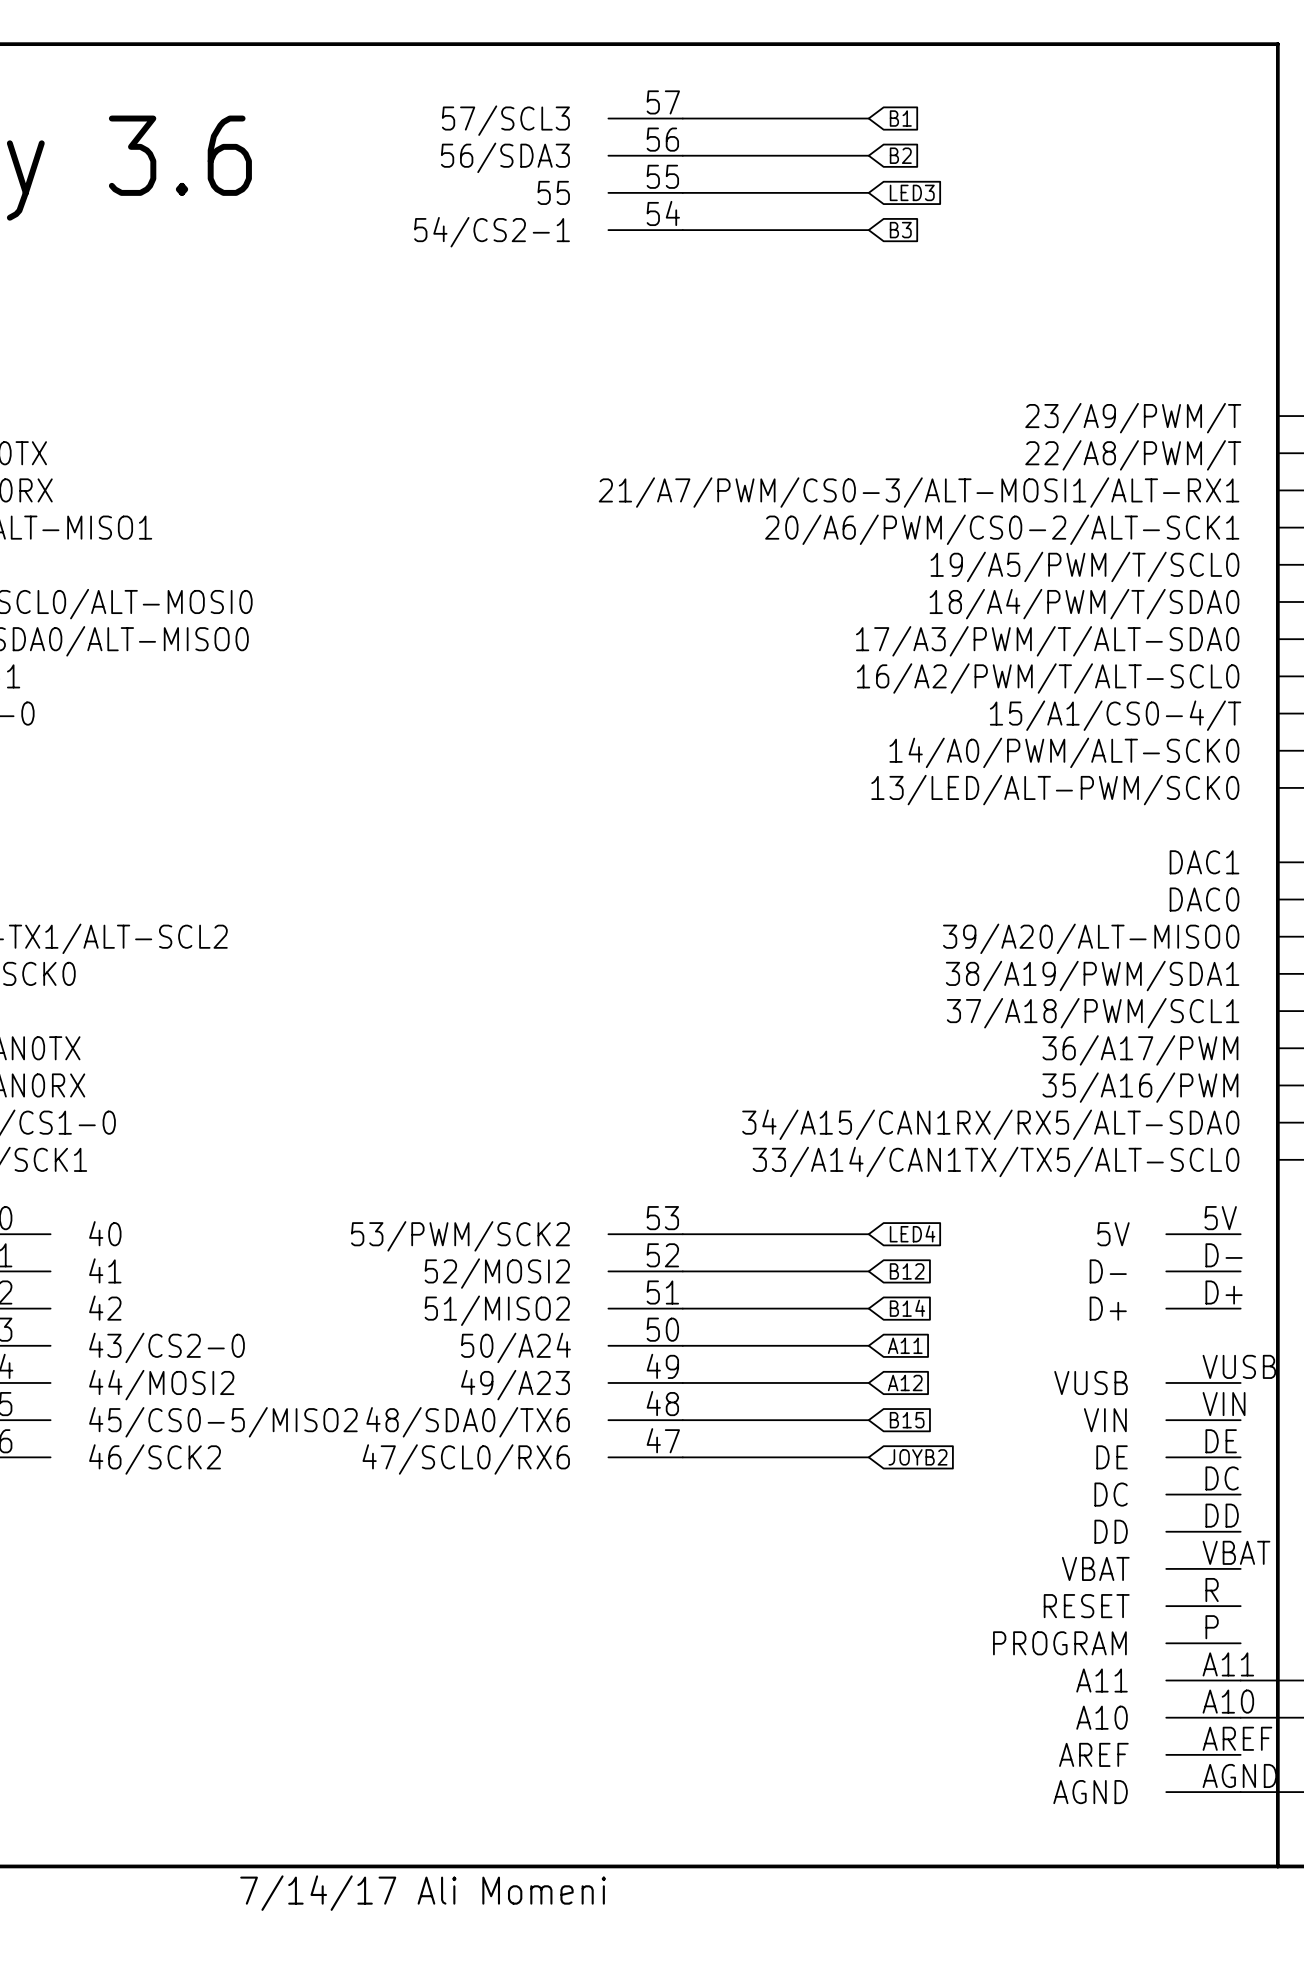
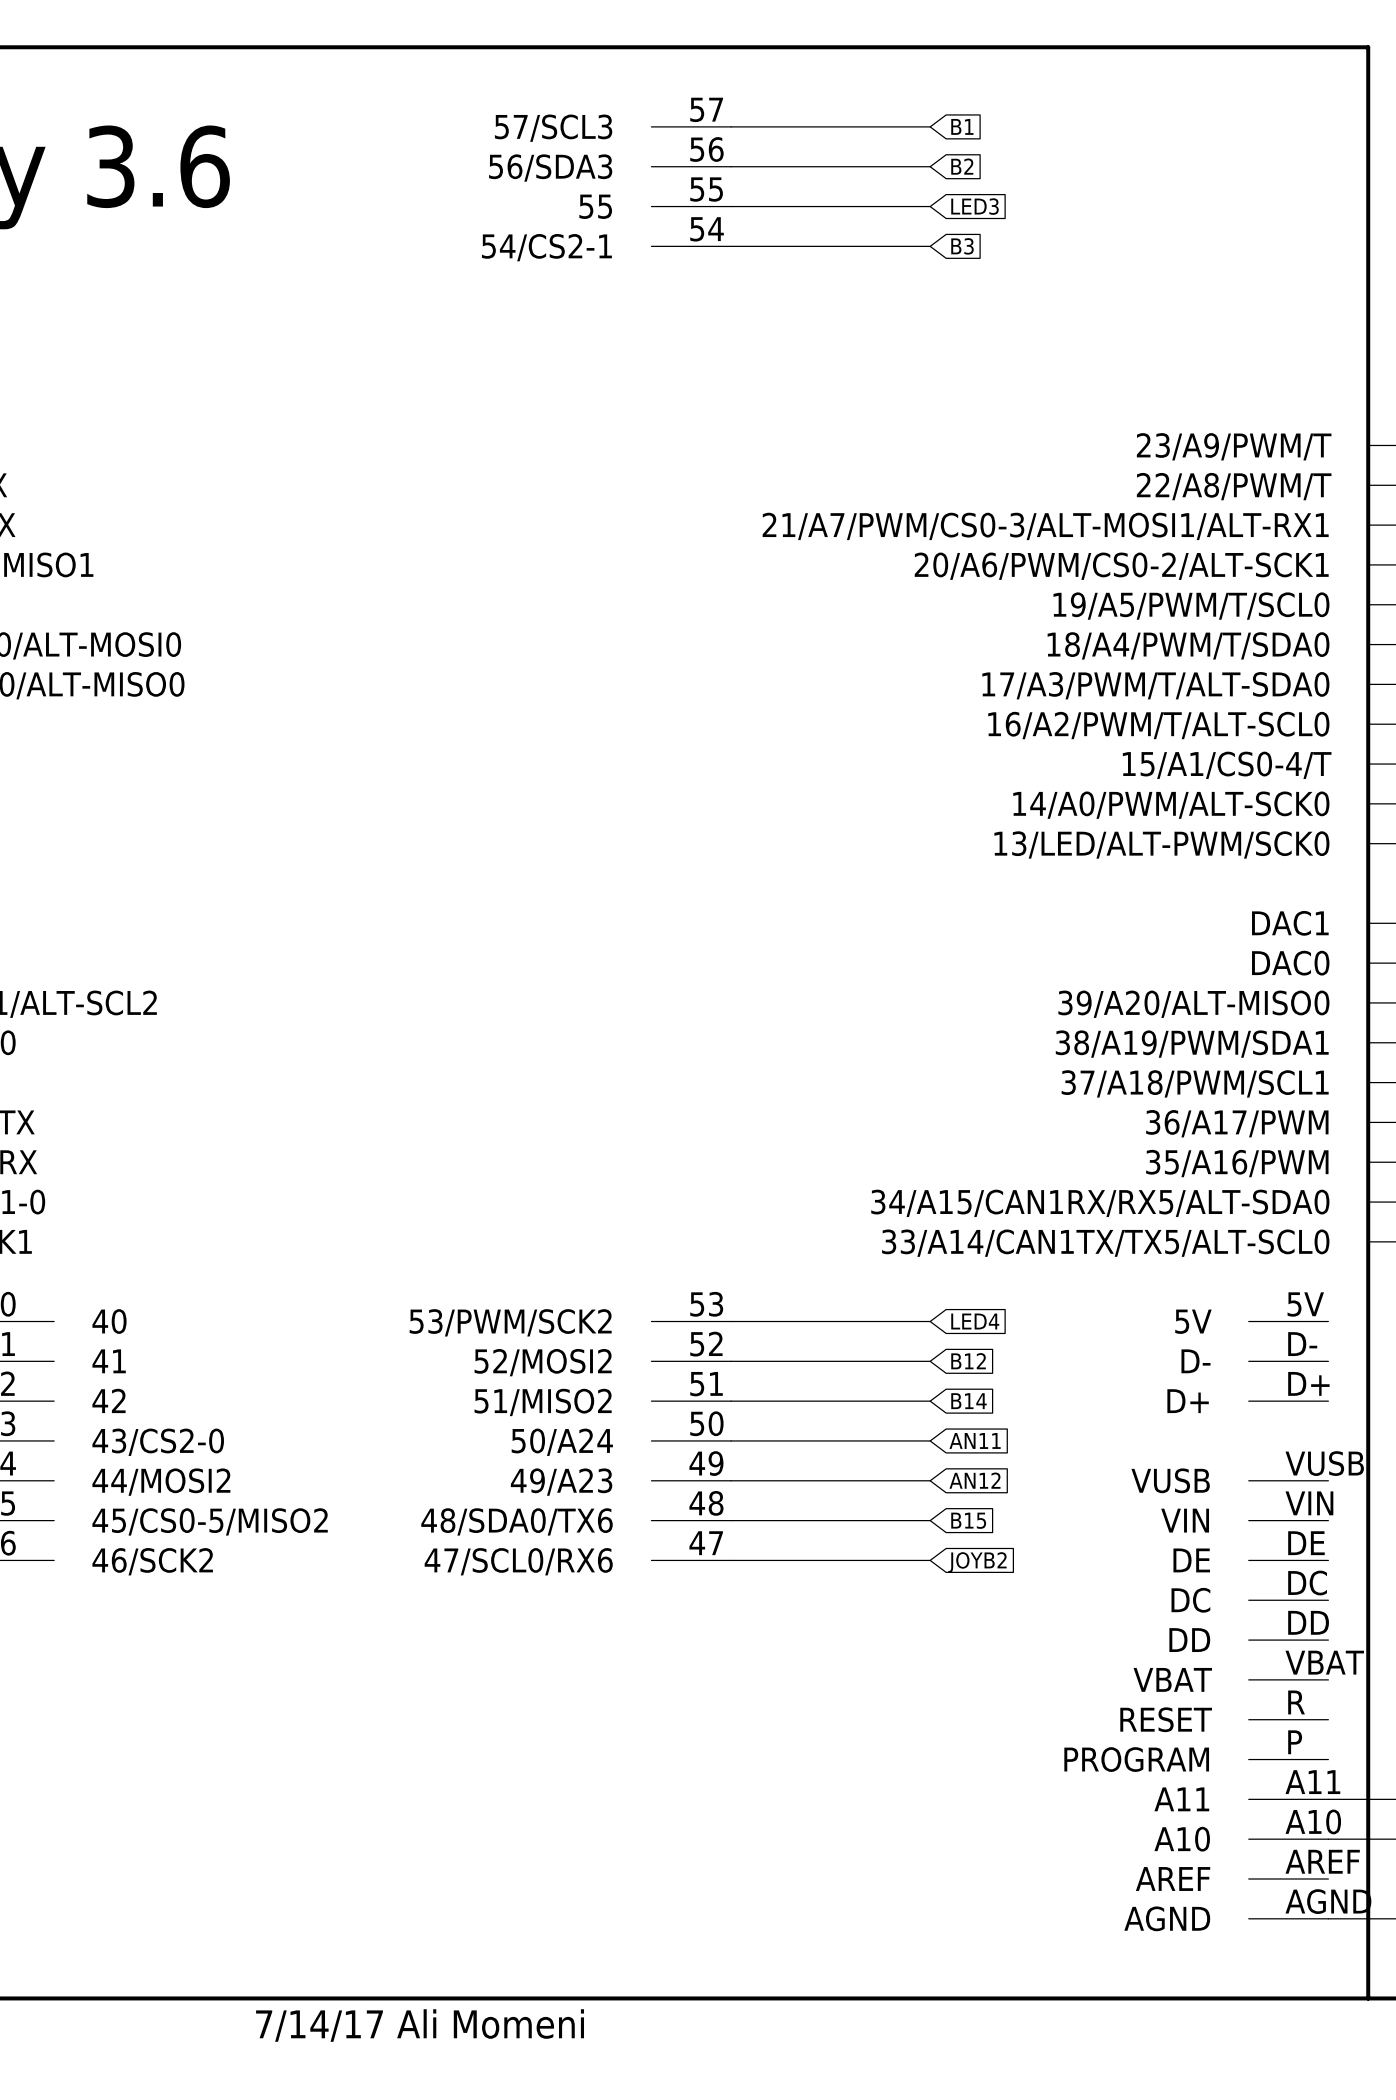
global label: A11 (905, 1345) -> AN11 (975, 1440)
global label: A12 (905, 1382) -> AN12 (975, 1480)

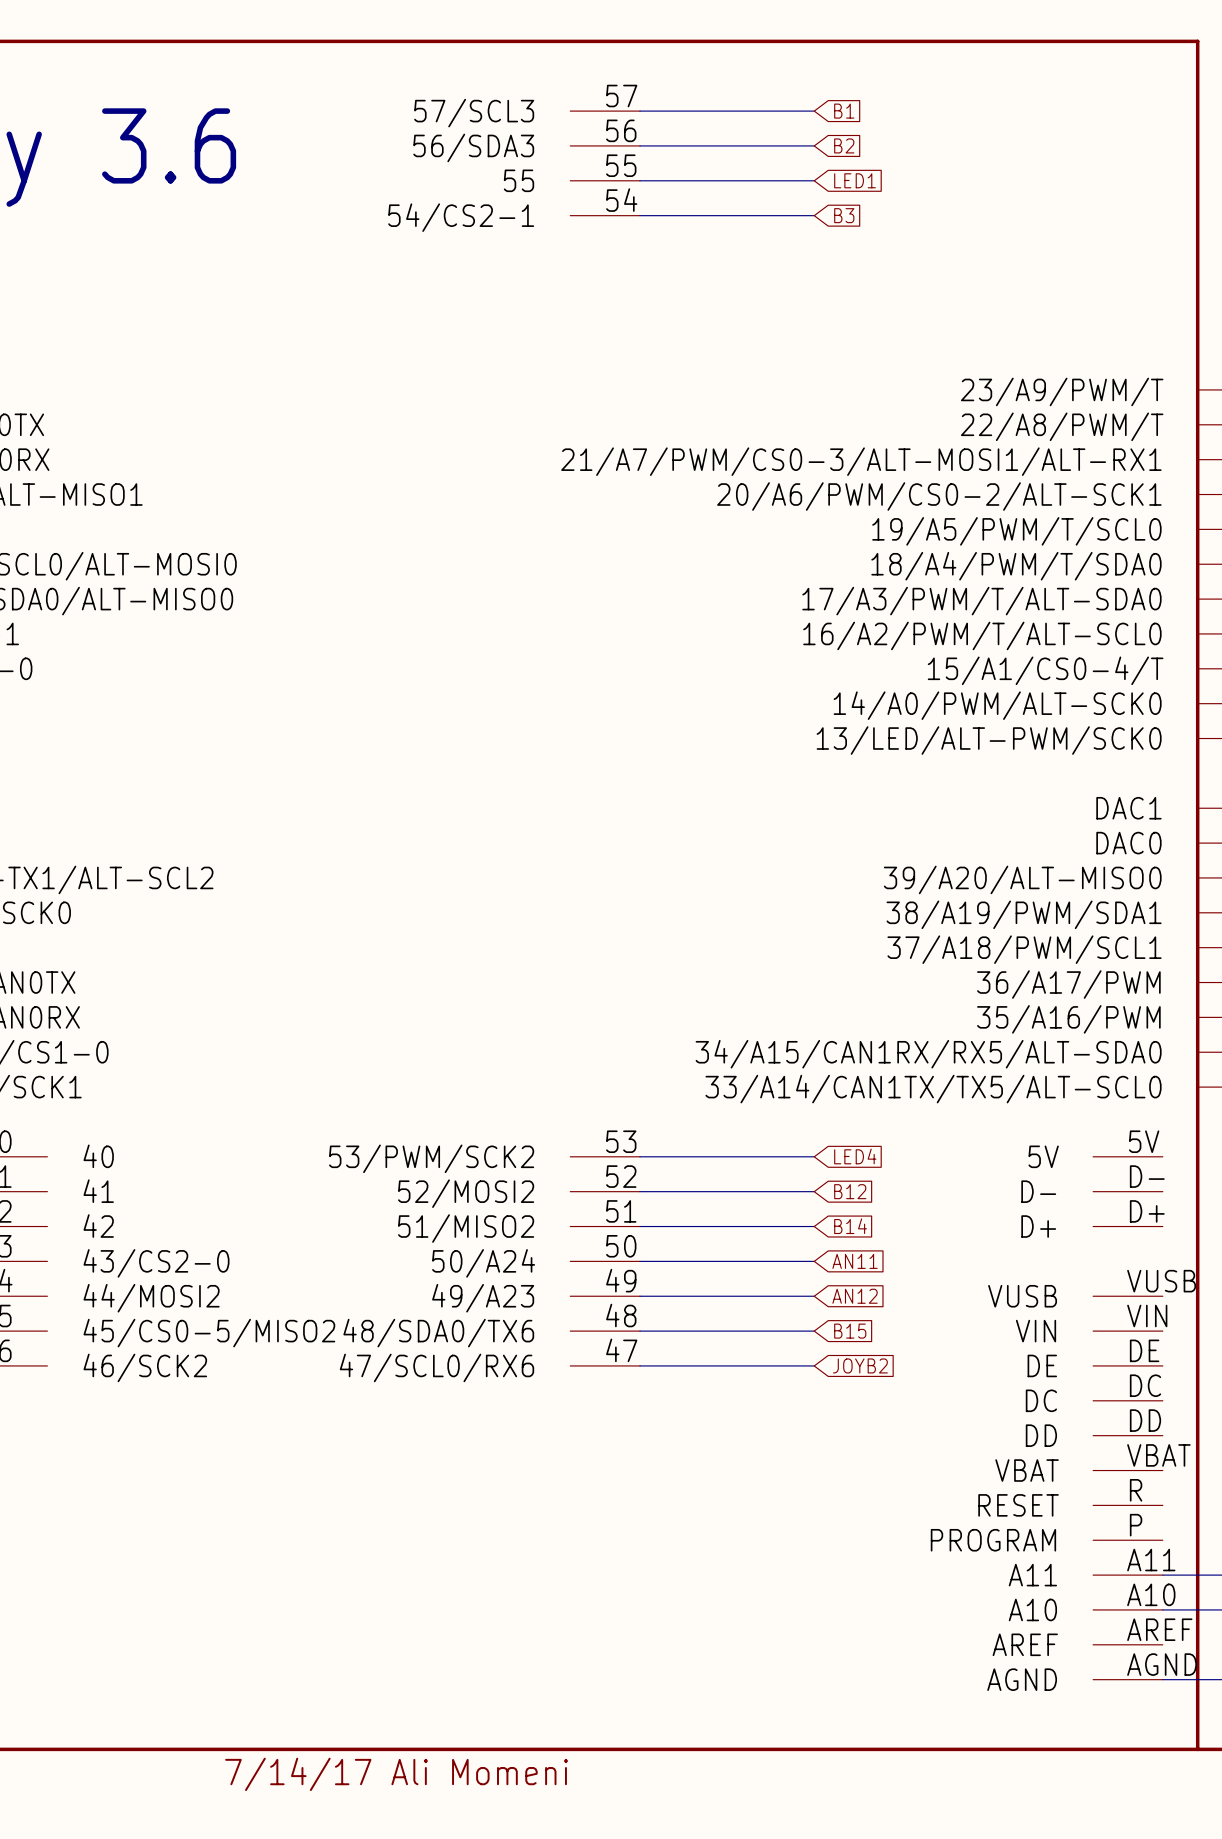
global label: LED3 (975, 206) -> LED1 (855, 180)

